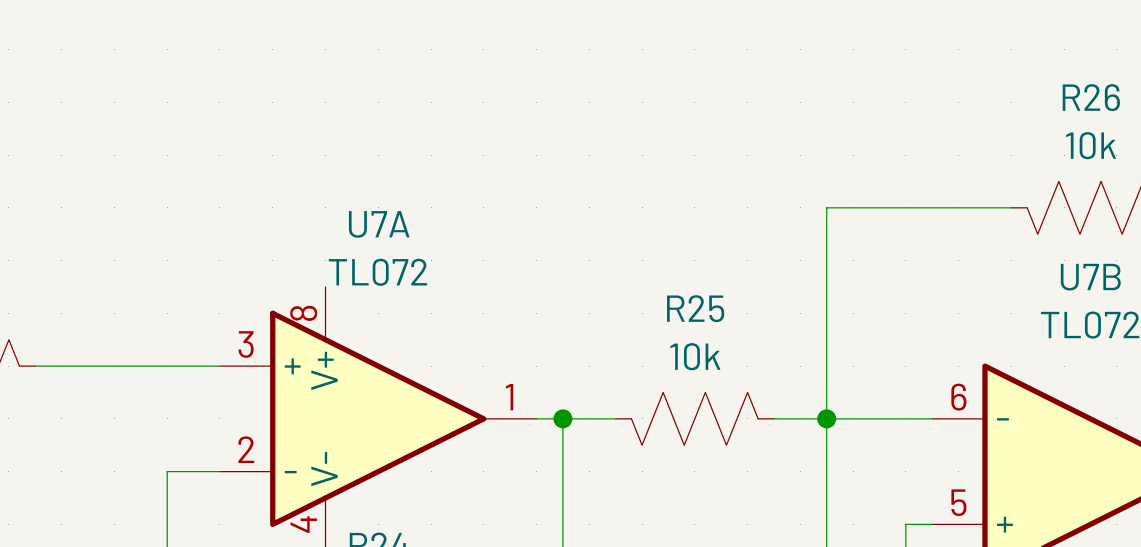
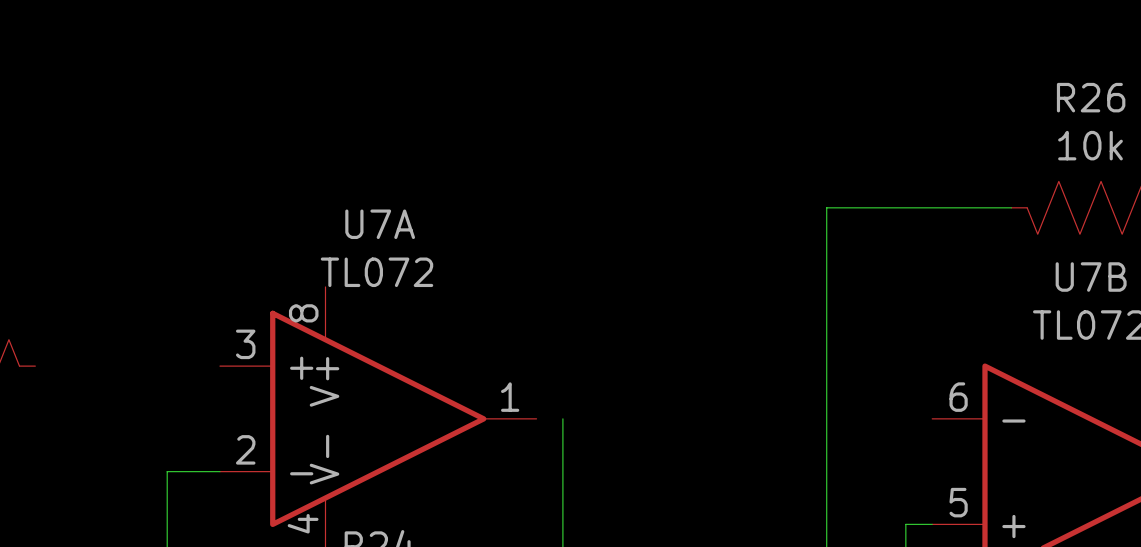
wire: (35, 366) (219, 366) -> none
wire: (536, 418) (615, 418) -> none
junction: (562, 418) -> none
R25: 10k (694, 418) -> none
wire: (773, 418) (932, 418) -> none
junction: (826, 418) -> none

